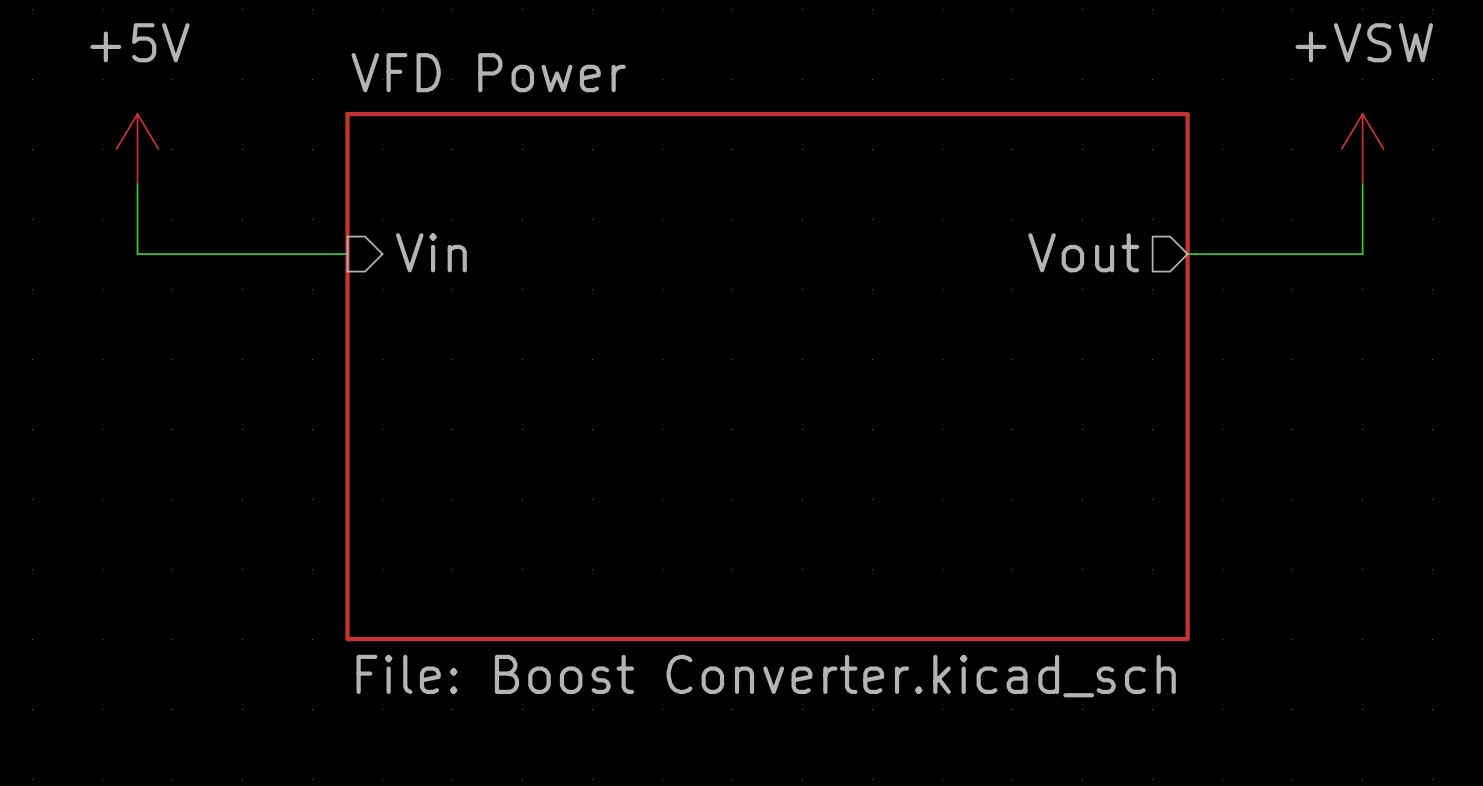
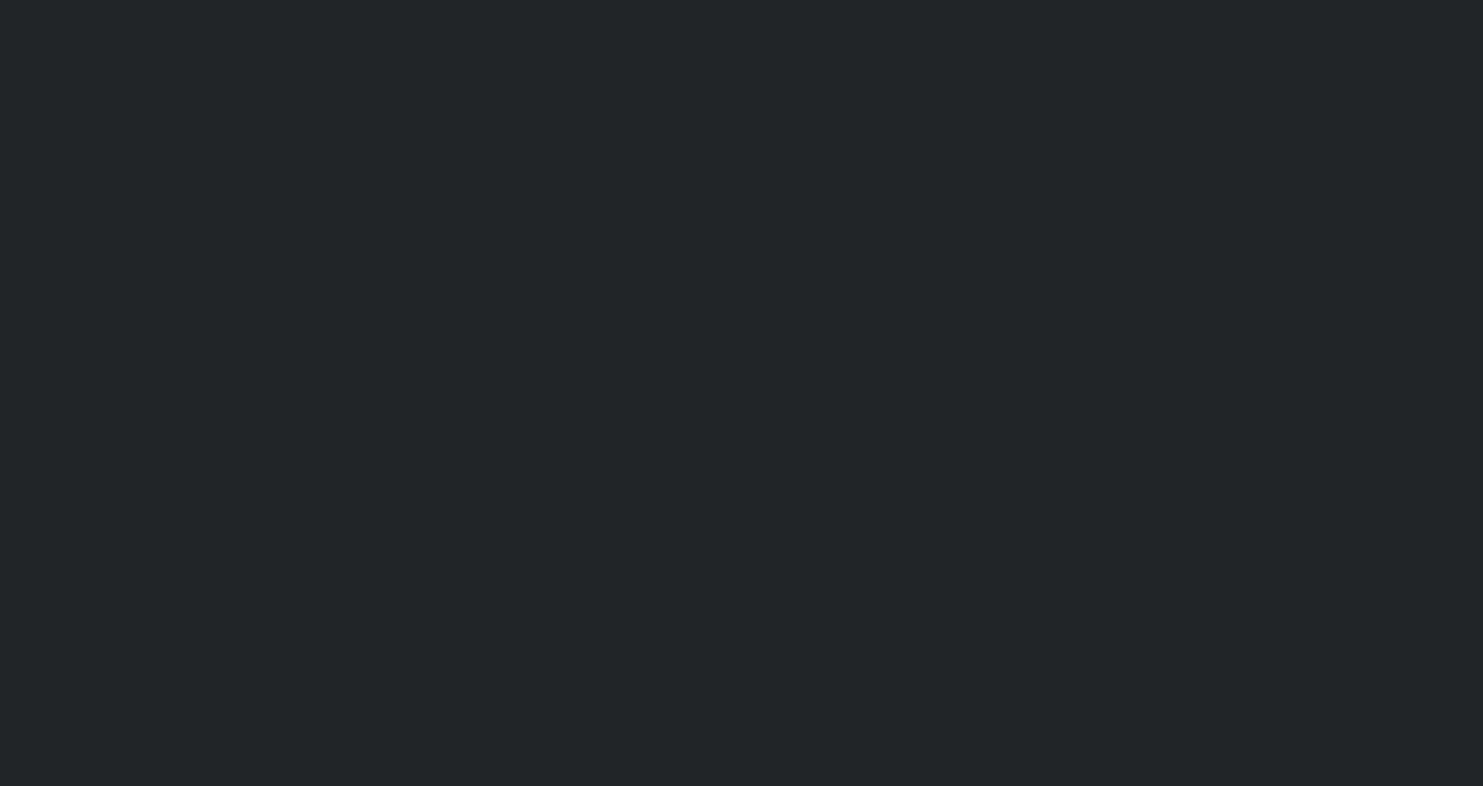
power symbol: +5V (137, 149) -> none
power symbol: +VSW (1362, 149) -> none
wire: (137, 184) (137, 254) (347, 254) -> none
wire: (1362, 184) (1362, 254) (1187, 254) -> none
sheet pin: Vin (431, 252) -> none
sheet pin: Vout (1083, 252) -> none
sheet VFD Power: File: Boost Converter.kicad_sch (767, 376) -> none

